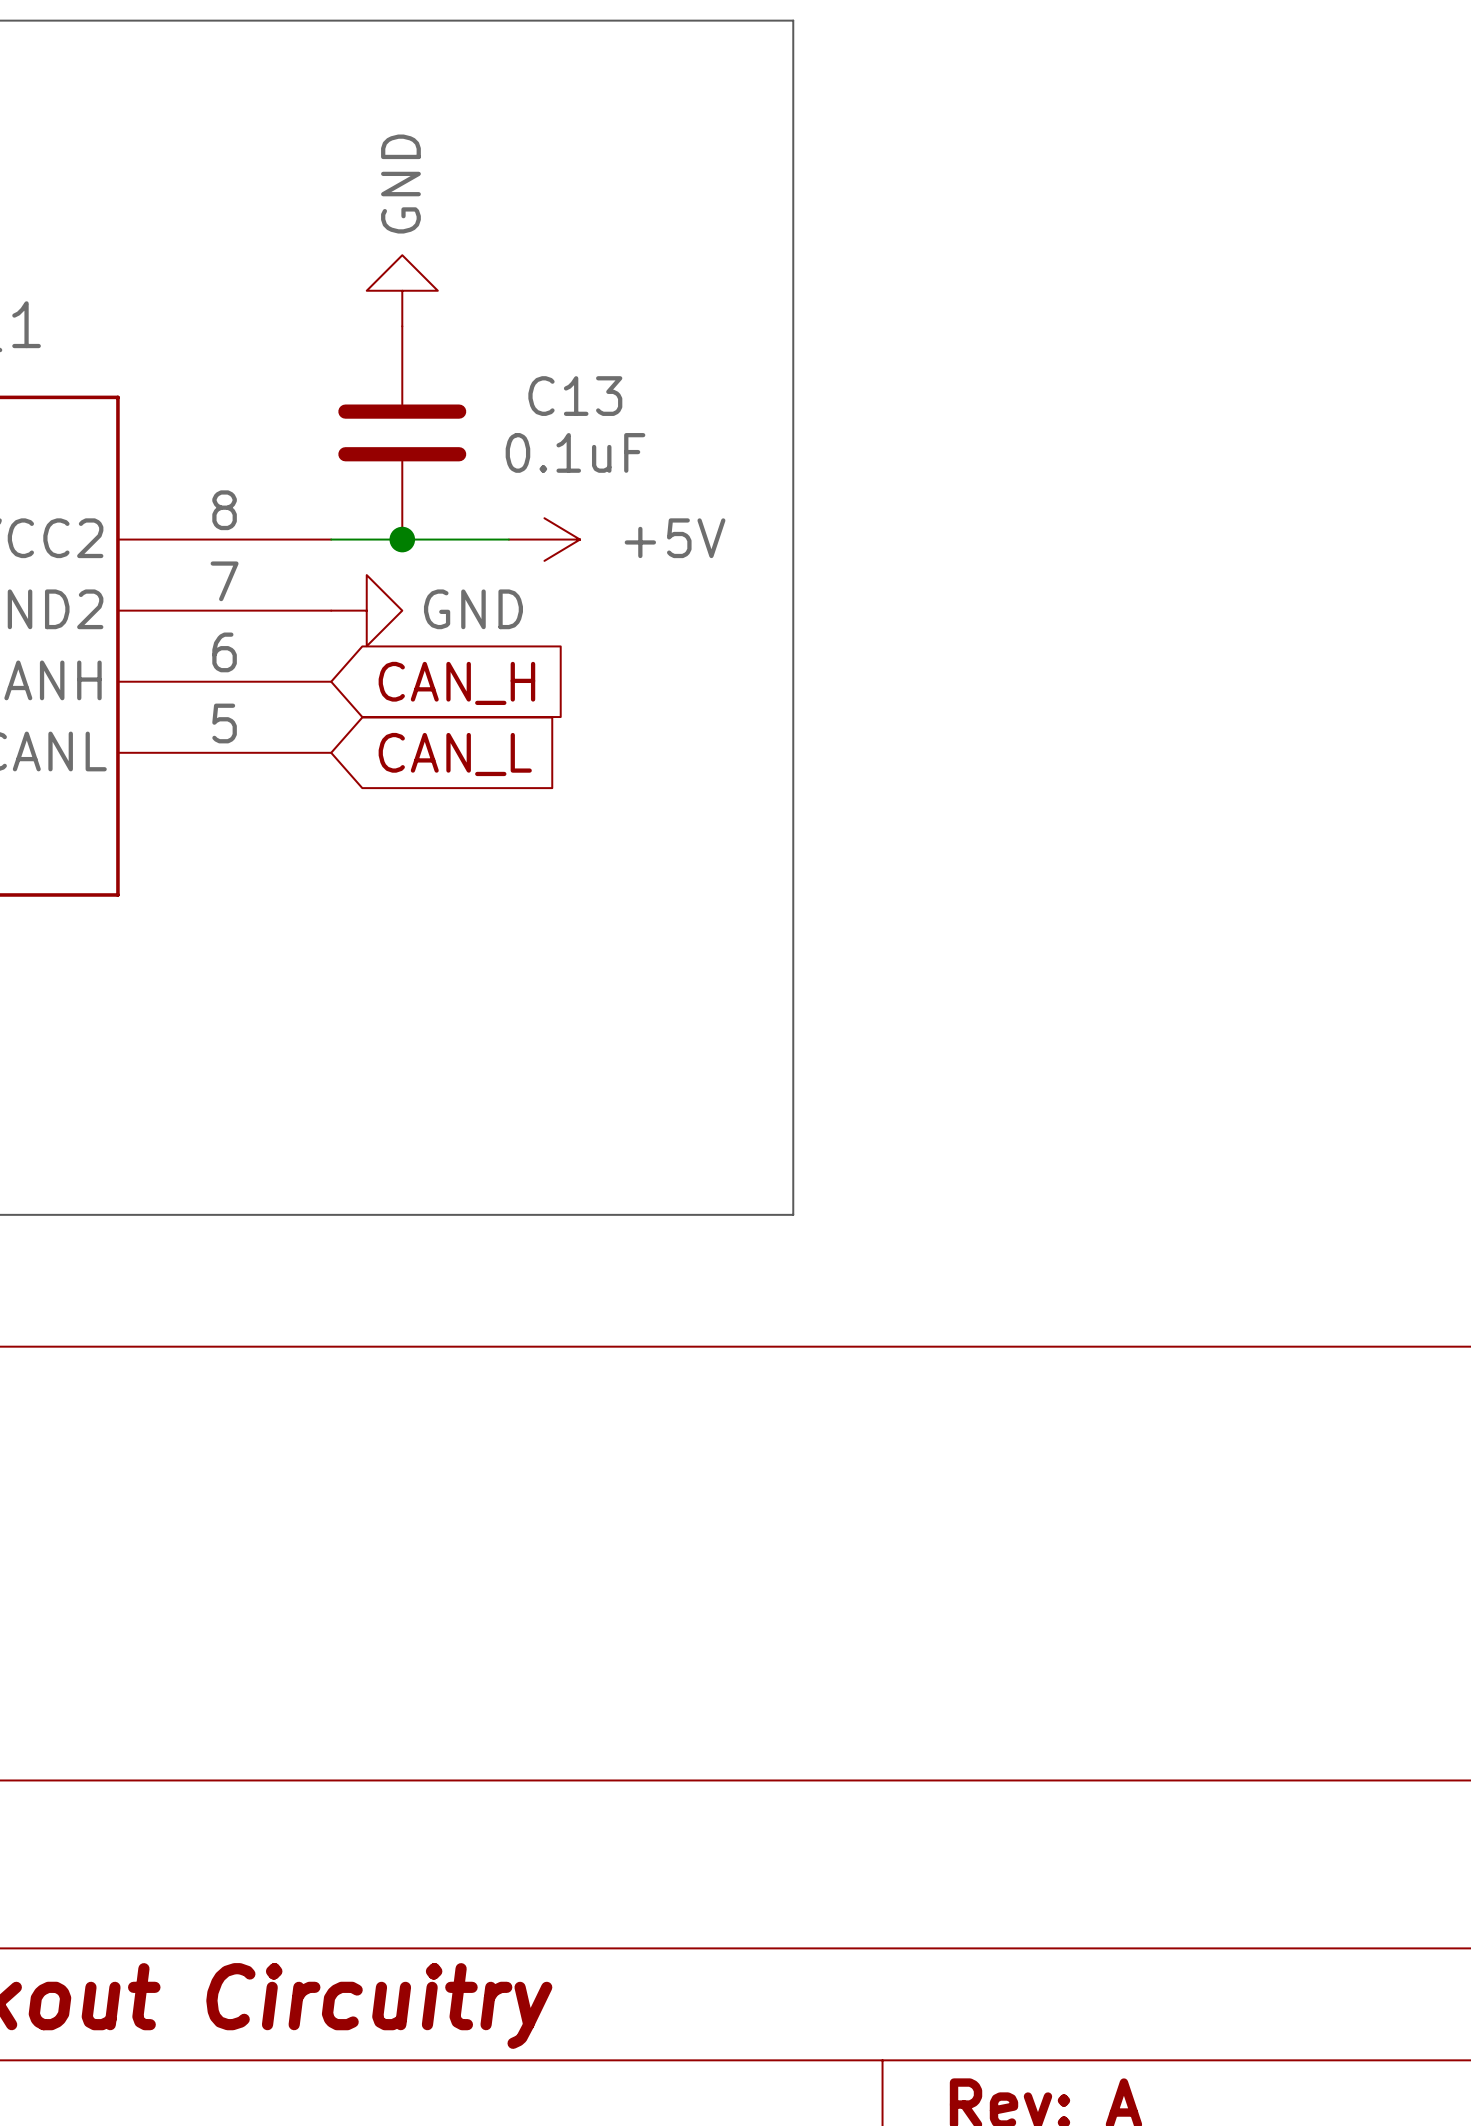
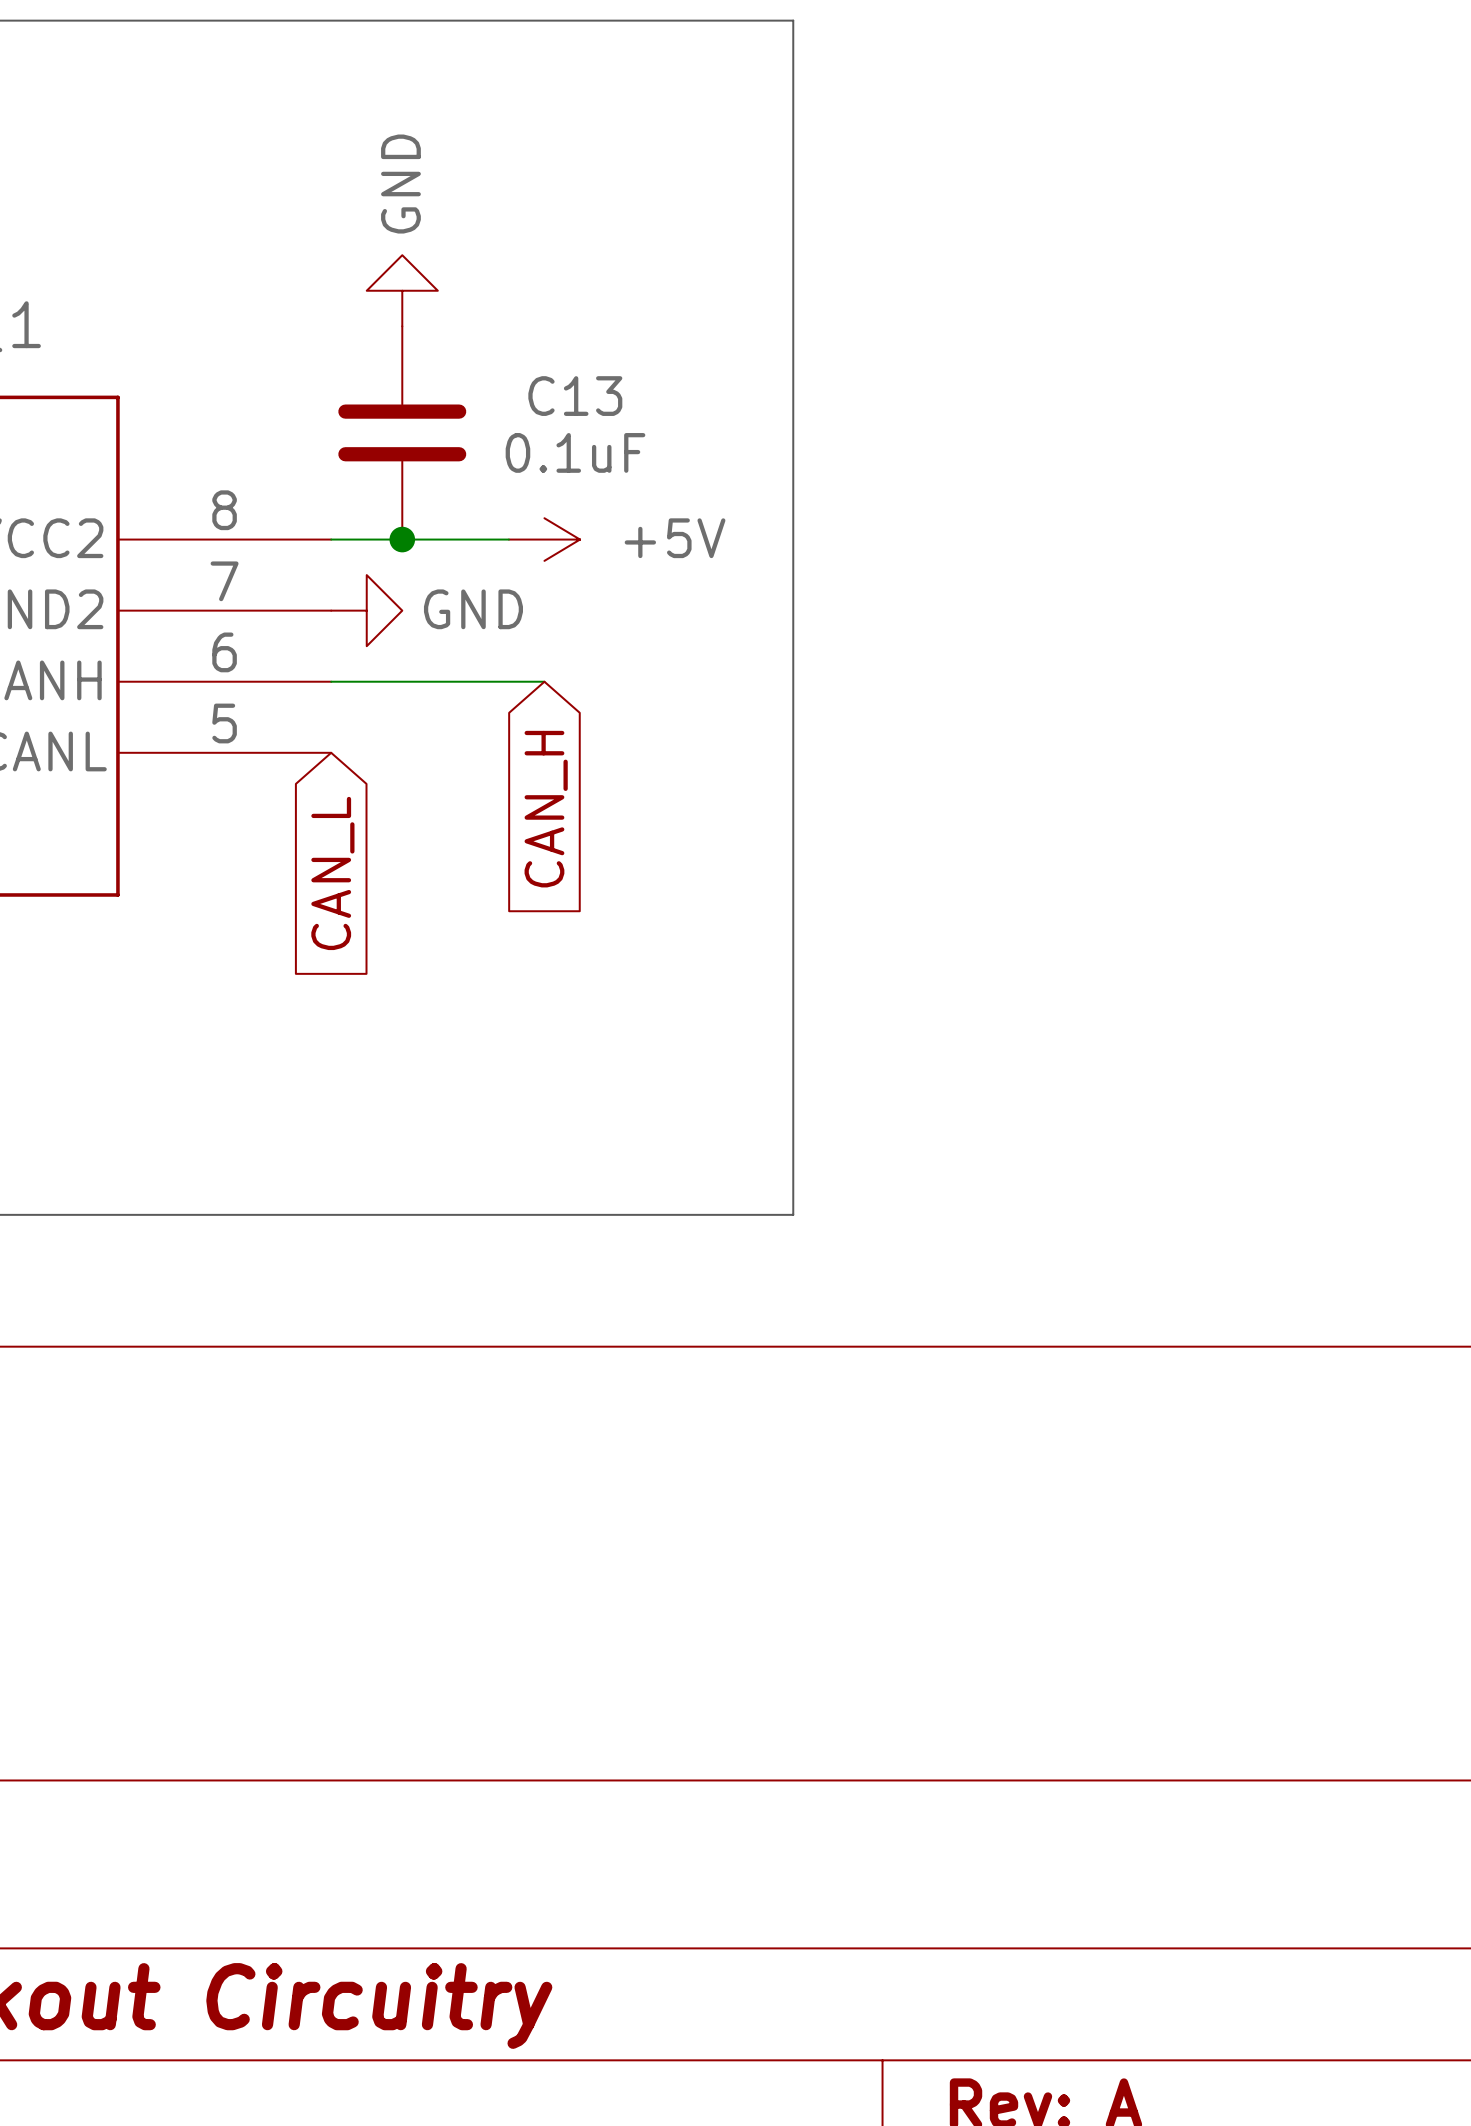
wire: none -> (331, 681) (544, 681)
global label rotation: 0° (456, 683) -> 90° clockwise (546, 809)
global label rotation: 0° (455, 754) -> 90° clockwise (332, 873)

